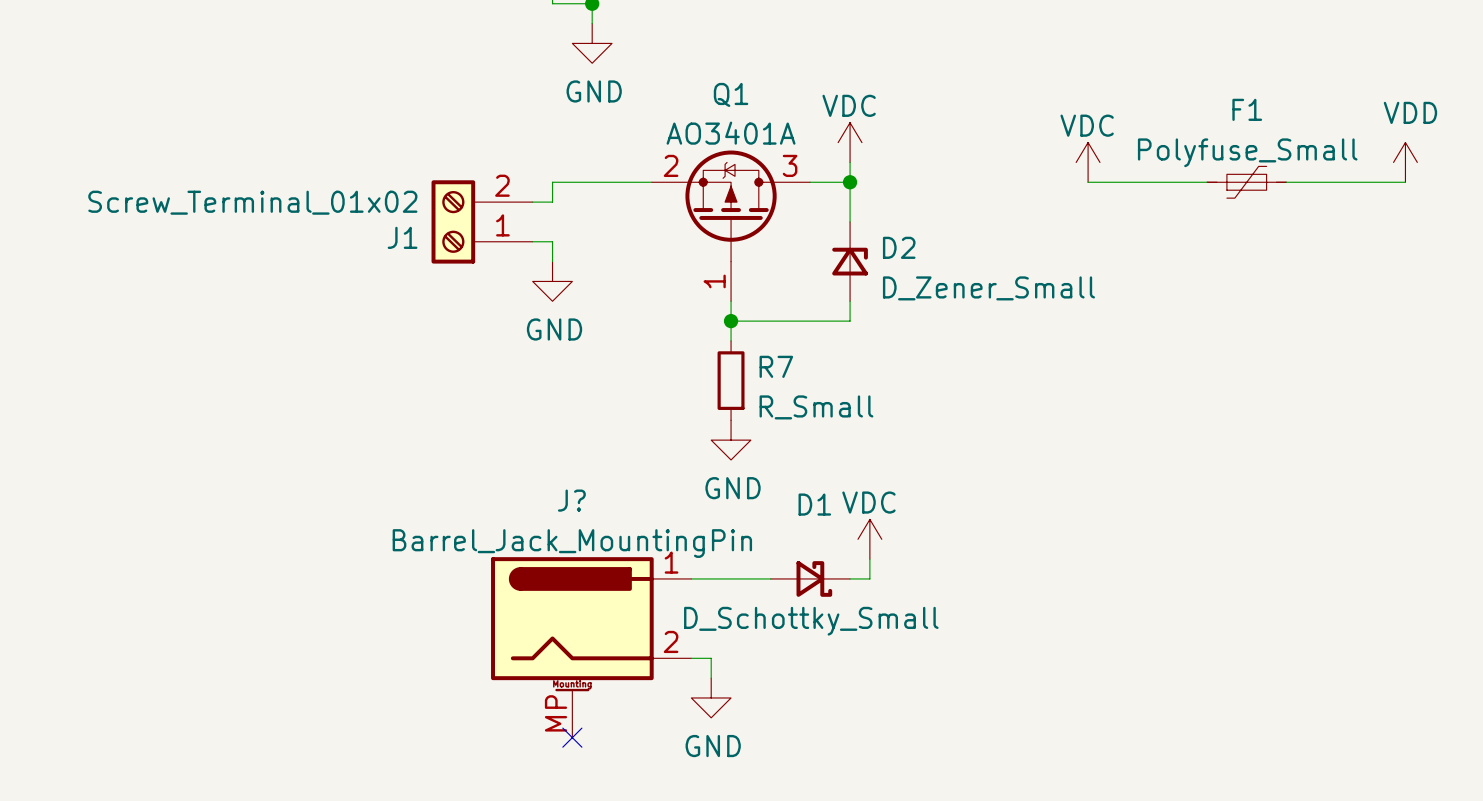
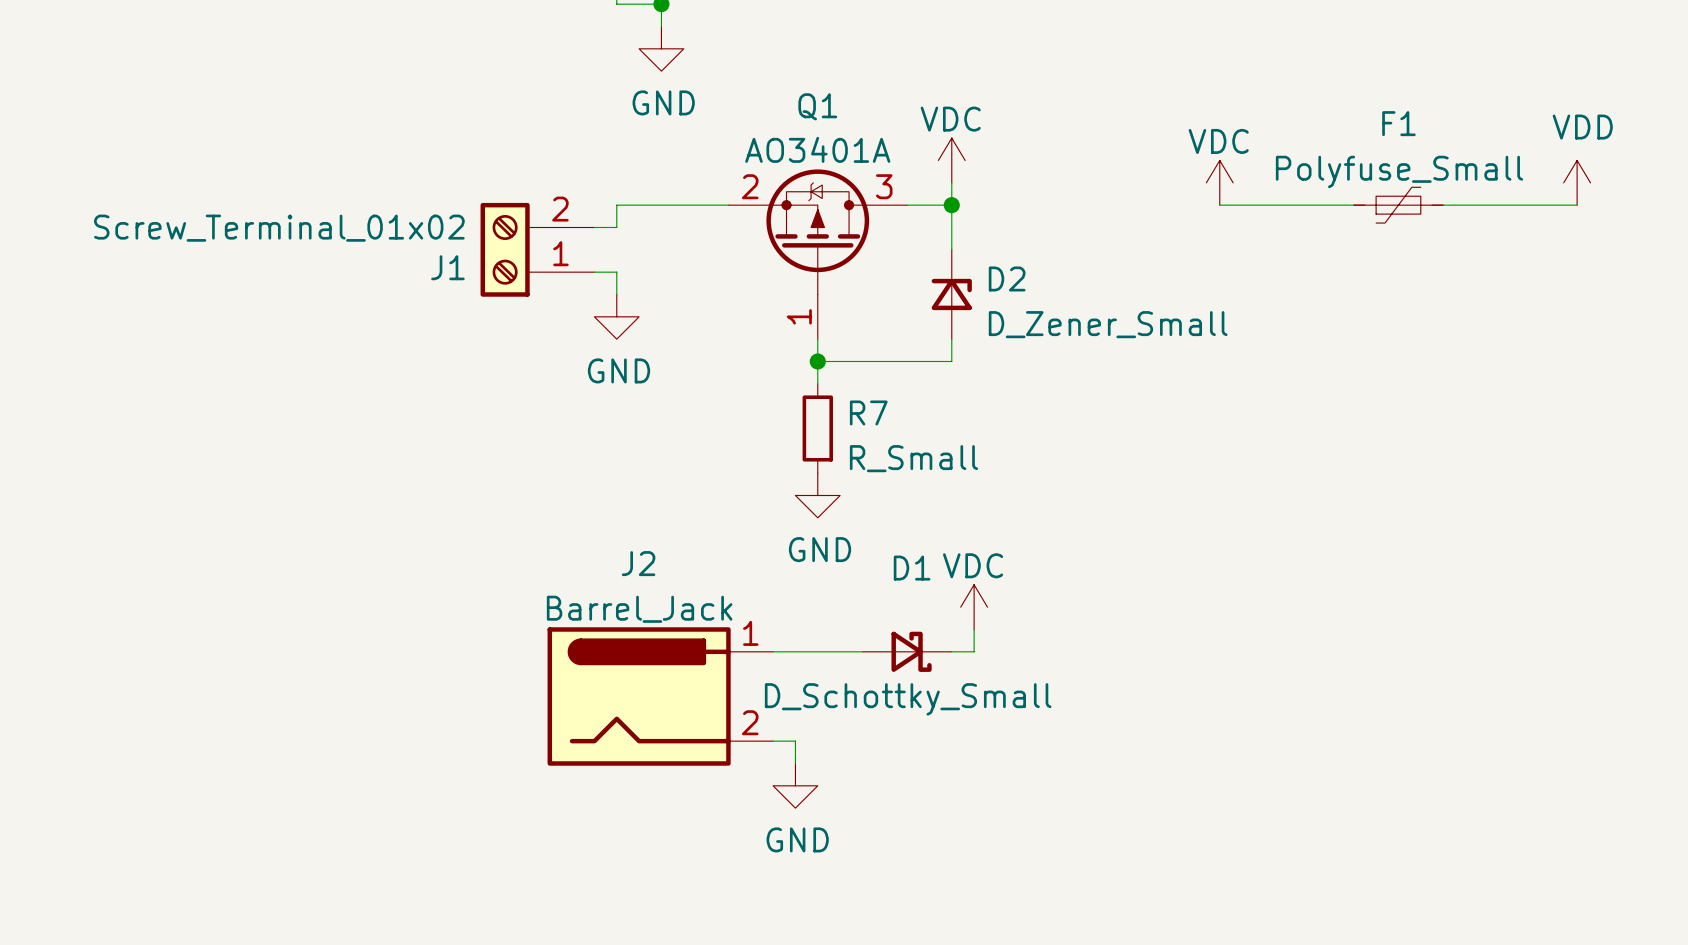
J2: none -> Barrel_Jack (660, 696)
J?: Barrel_Jack_MountingPin (591, 647) -> none
no-connect mark: (572, 737) -> none

